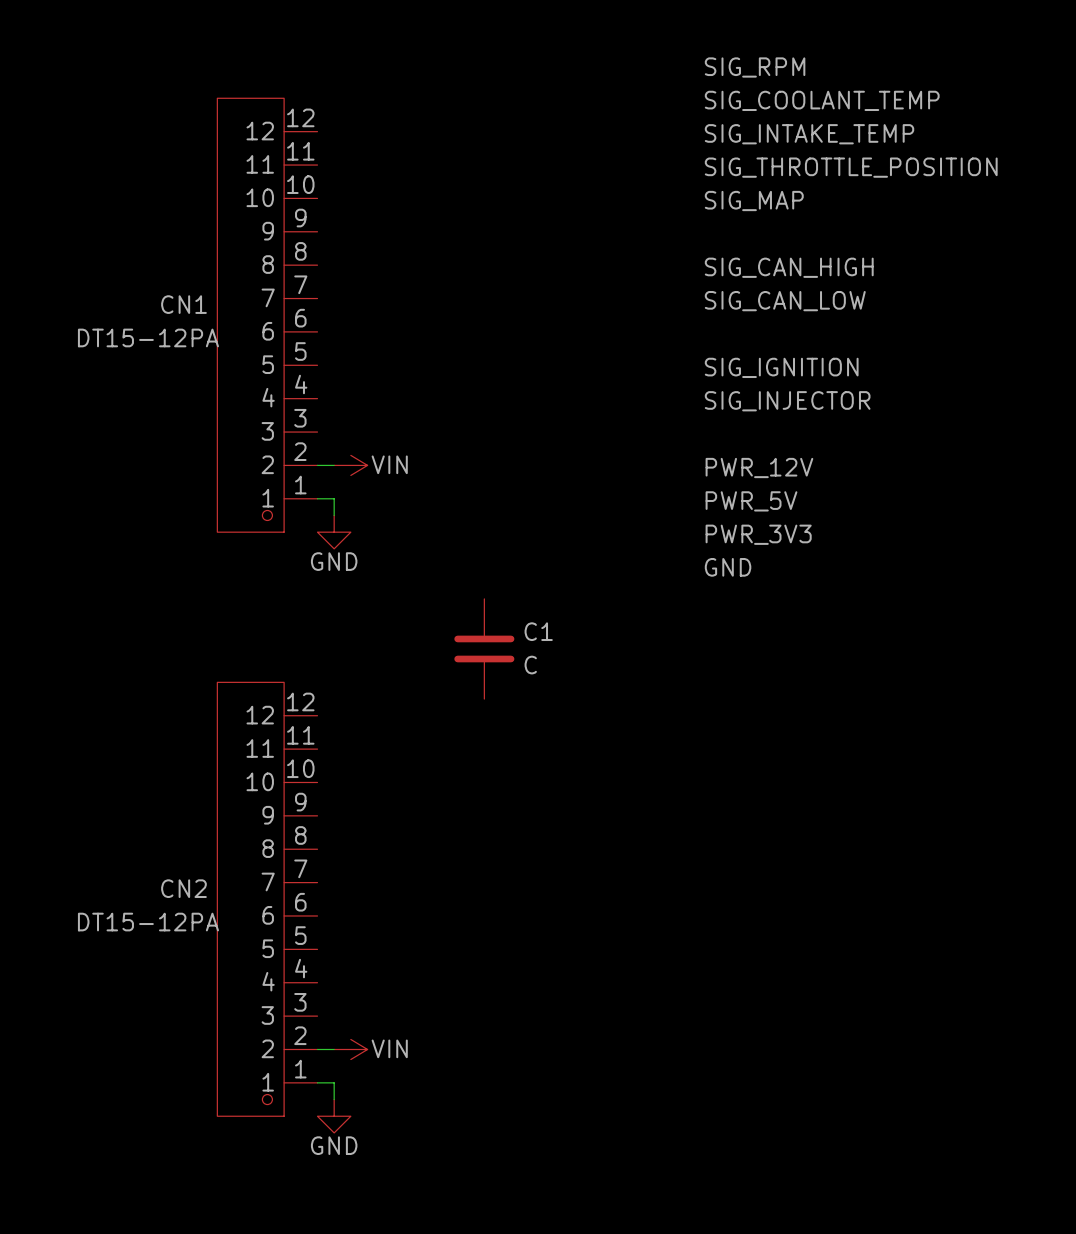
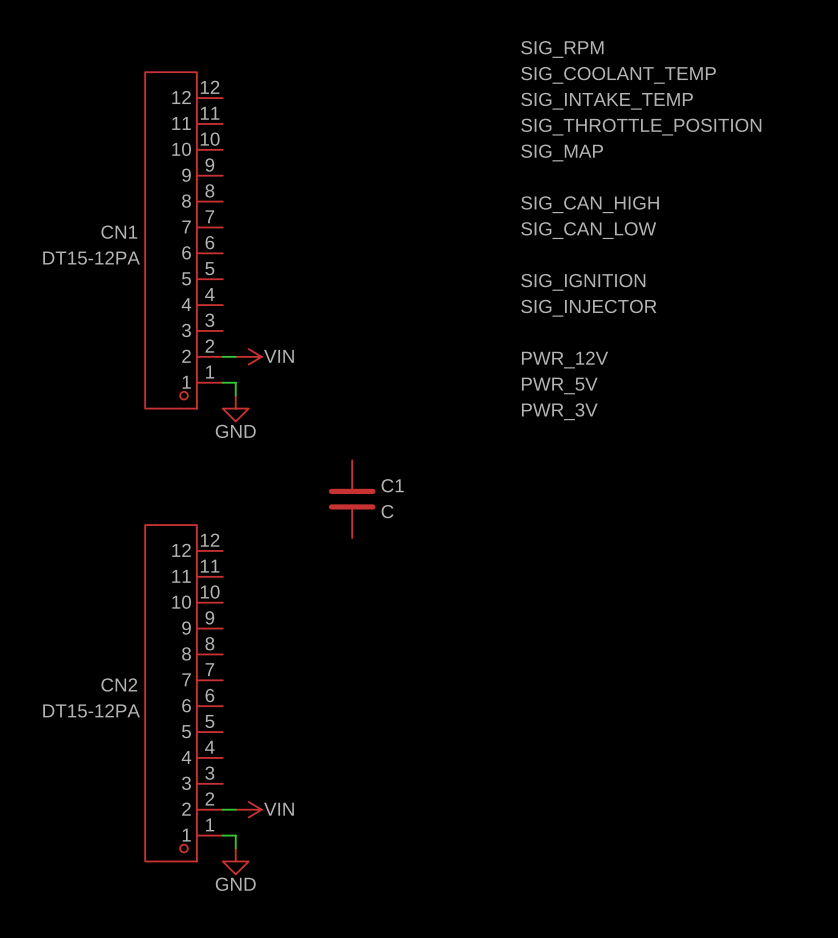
label: PWR_3V3 (758, 534) -> PWR_3V (559, 411)
label: GND (728, 567) -> none

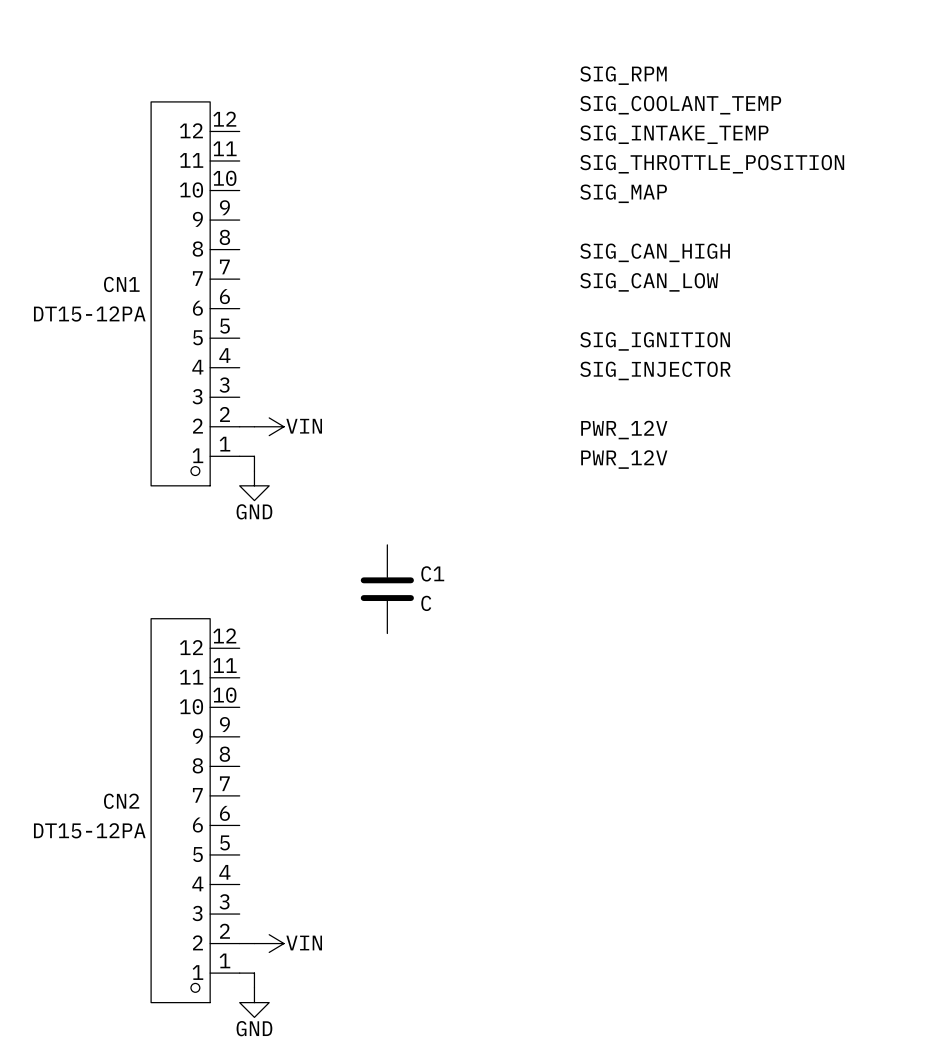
label: PWR_5V (559, 385) -> PWR_12V (624, 459)
label: PWR_3V (559, 411) -> none

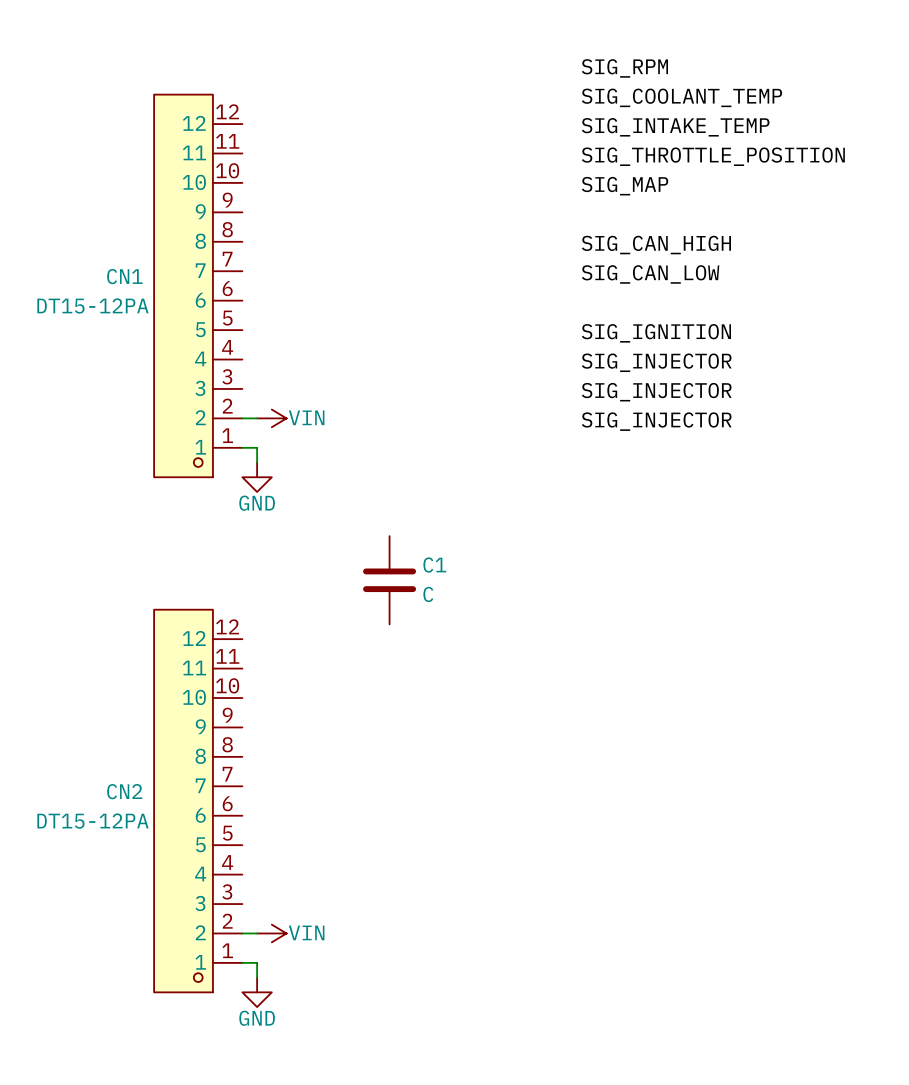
label: none -> SIG_INJECTOR (656, 392)
label: PWR_12V (624, 430) -> SIG_INJECTOR (656, 421)
label: PWR_12V (624, 459) -> none

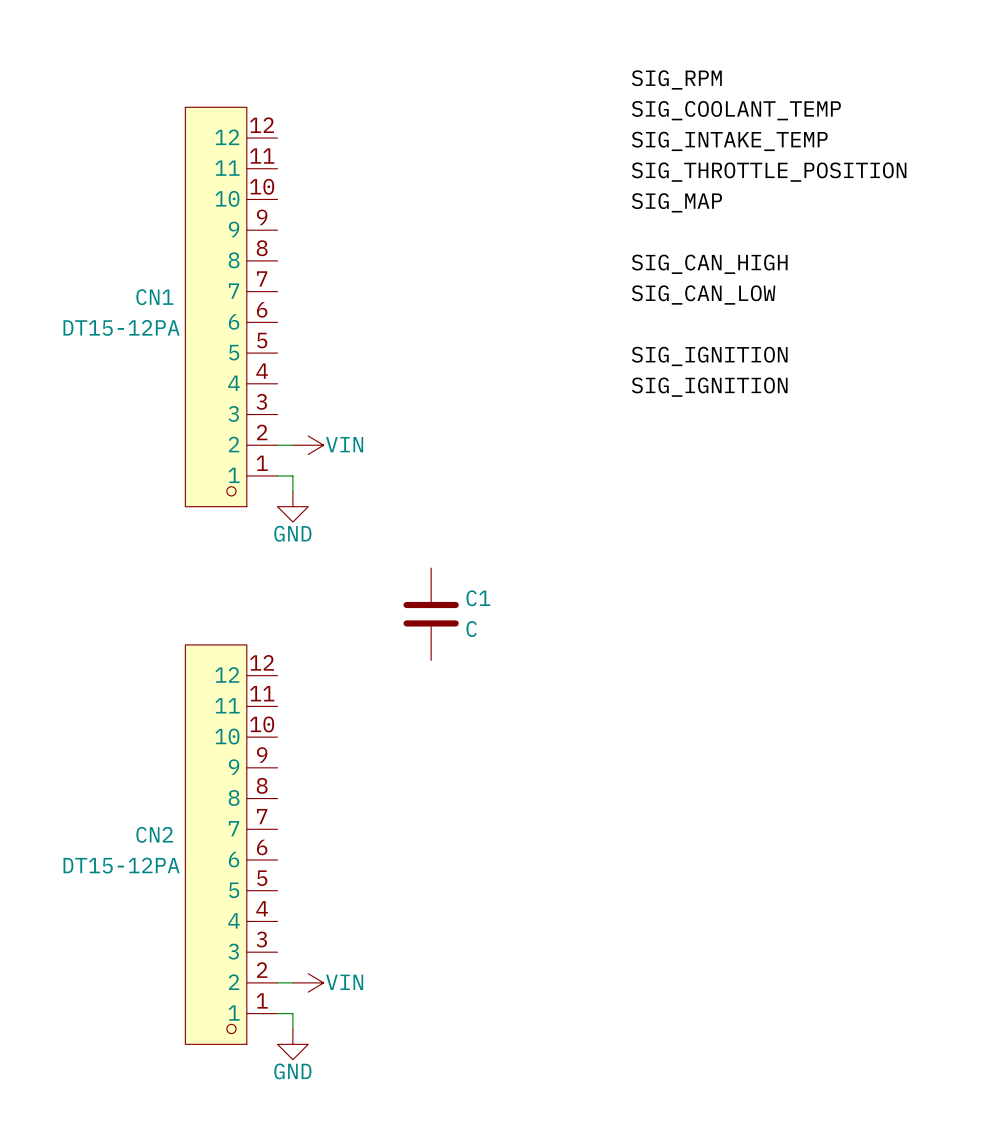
label: SIG_INJECTOR (656, 362) -> SIG_IGNITION (709, 387)
label: SIG_INJECTOR (656, 392) -> none
label: SIG_INJECTOR (656, 421) -> none

